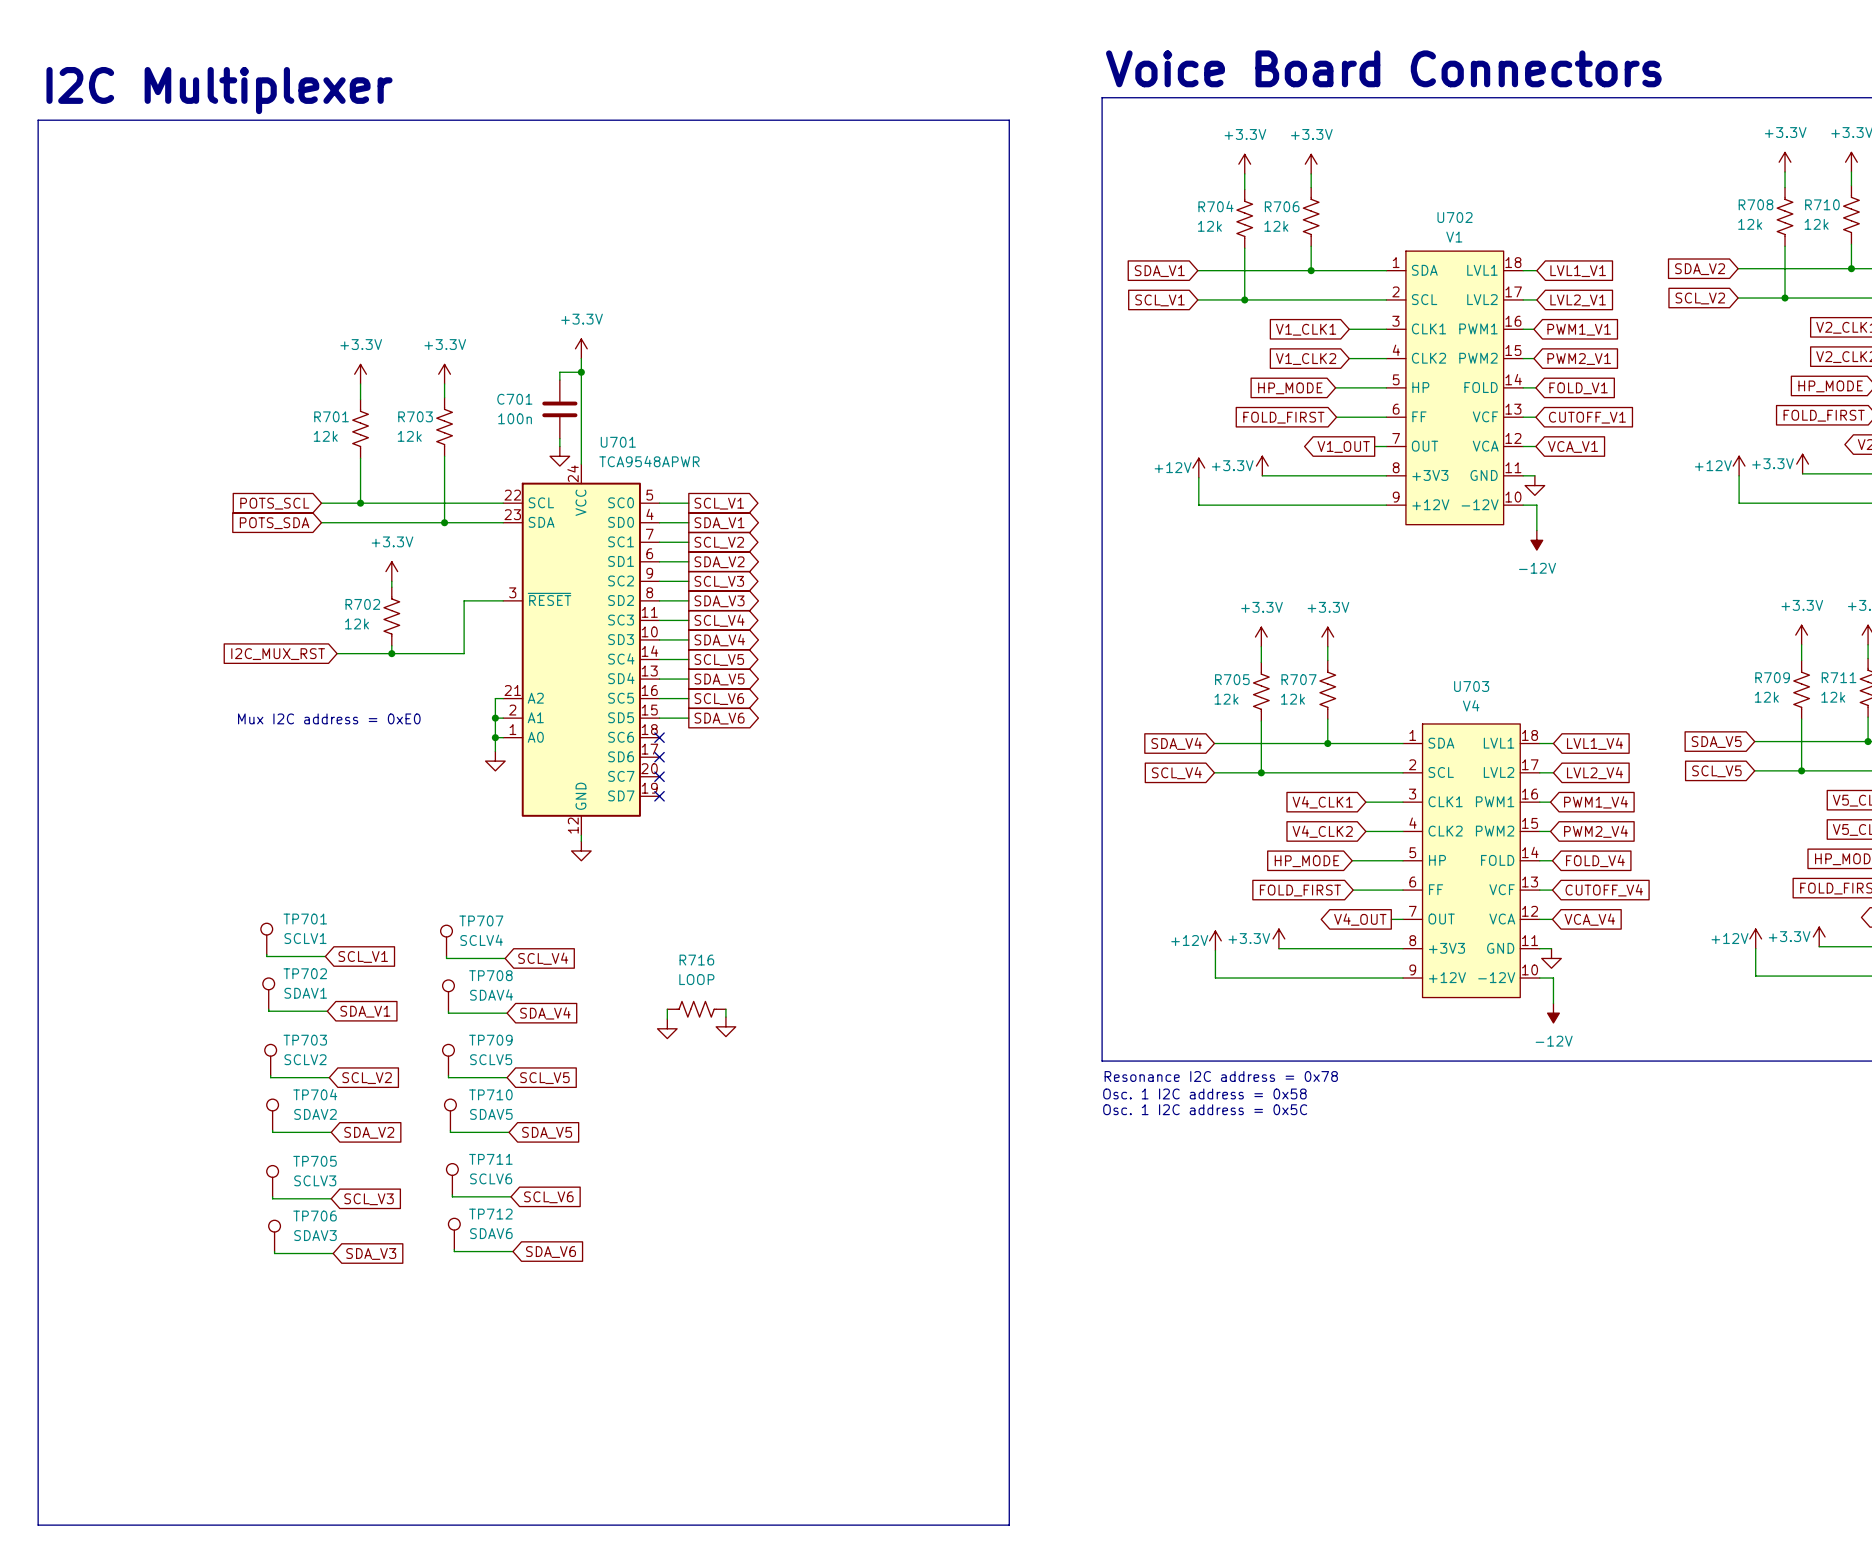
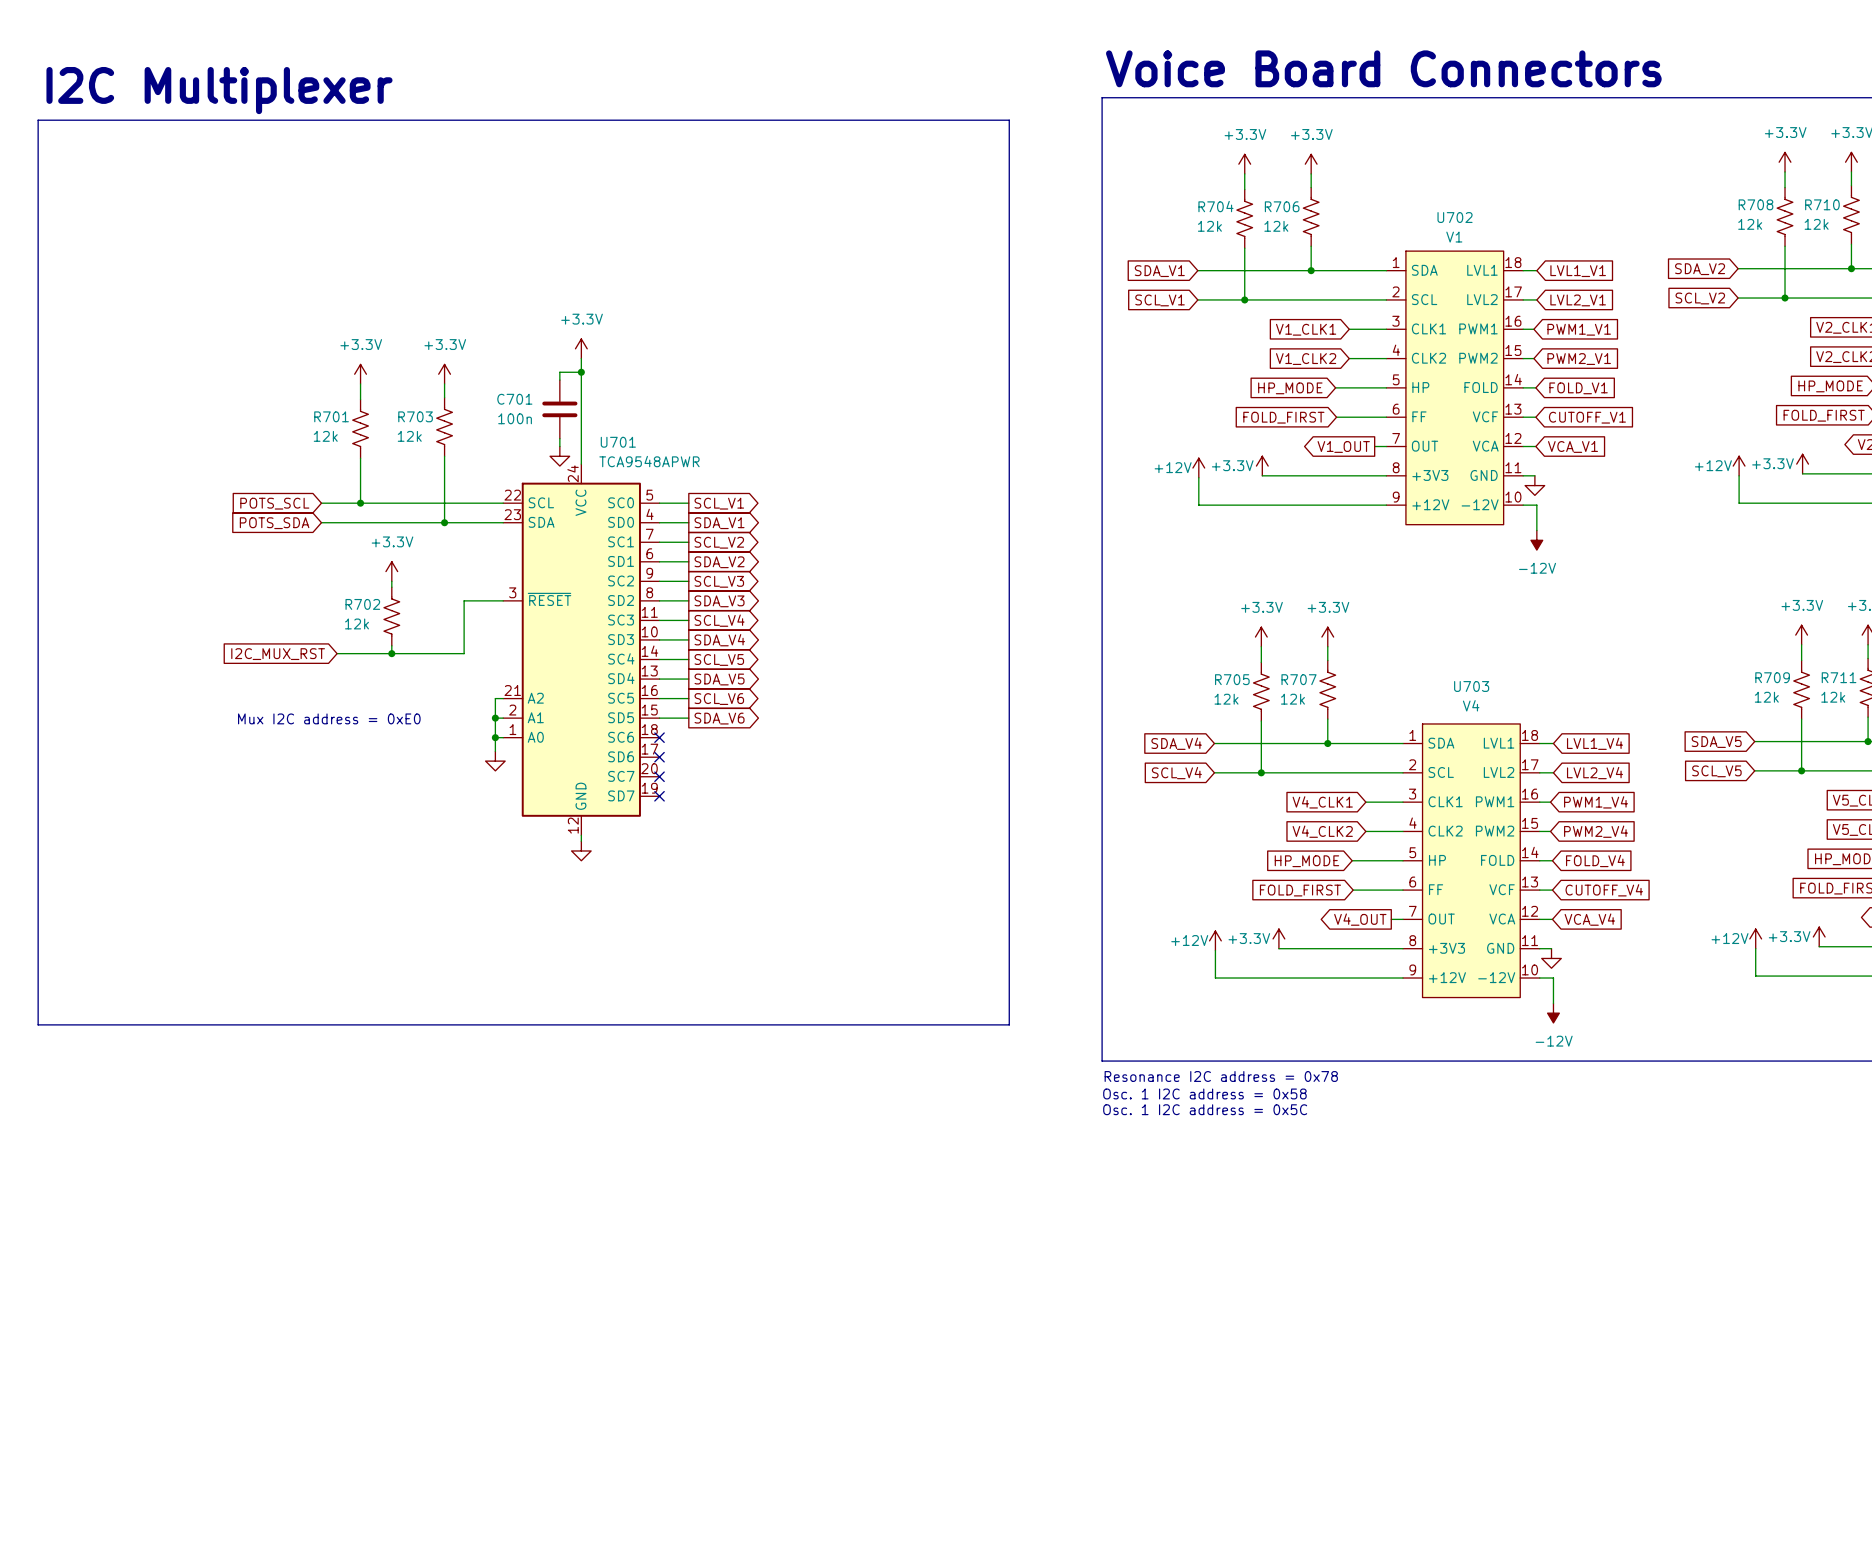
TP701: SCLV1 (266, 938) -> none
TP707: SCLV4 (446, 940) -> none
wire: (266, 954) (266, 956) (325, 956) -> none
global label: SCL_V1 (363, 956) -> none
wire: (446, 956) (446, 958) (505, 958) -> none
global label: SCL_V4 (543, 958) -> none
TP702: SDAV1 (268, 993) -> none
TP708: SDAV4 (448, 995) -> none
wire: (268, 1009) (268, 1011) (327, 1011) -> none
wire: (667, 1009) (667, 1019) -> none
R716: LOOP (696, 1009) -> none
wire: (725, 1009) (725, 1017) -> none
global label: SDA_V1 (365, 1011) -> none
wire: (448, 1011) (448, 1013) (507, 1013) -> none
global label: SDA_V4 (545, 1013) -> none
line: (38, 1024) (38, 1525) (1009, 1525) (1009, 1024) -> (38, 1024) (1009, 1024)
power symbol: (725, 1026) -> none
power symbol: (667, 1028) -> none
TP703: SCLV2 (270, 1060) -> none
TP709: SCLV5 (448, 1060) -> none
wire: (270, 1075) (270, 1077) (329, 1077) -> none
wire: (448, 1075) (448, 1077) (507, 1077) -> none
global label: SCL_V2 (367, 1078) -> none
global label: SCL_V5 (544, 1078) -> none
TP704: SDAV2 (272, 1114) -> none
TP710: SDAV5 (450, 1114) -> none
wire: (272, 1130) (272, 1132) (331, 1132) -> none
wire: (450, 1130) (450, 1132) (509, 1132) -> none
global label: SDA_V2 (369, 1132) -> none
global label: SDA_V5 (547, 1132) -> none
TP711: SCLV6 (452, 1179) -> none
TP705: SCLV3 (272, 1181) -> none
wire: (452, 1194) (452, 1196) (511, 1196) -> none
wire: (272, 1196) (272, 1198) (331, 1198) -> none
global label: SCL_V6 (548, 1197) -> none
global label: SCL_V3 (369, 1199) -> none
TP712: SDAV6 (454, 1233) -> none
TP706: SDAV3 (274, 1235) -> none
wire: (454, 1249) (454, 1251) (512, 1251) -> none
wire: (274, 1251) (274, 1253) (333, 1253) -> none
global label: SDA_V6 (551, 1252) -> none
global label: SDA_V3 (371, 1253) -> none

